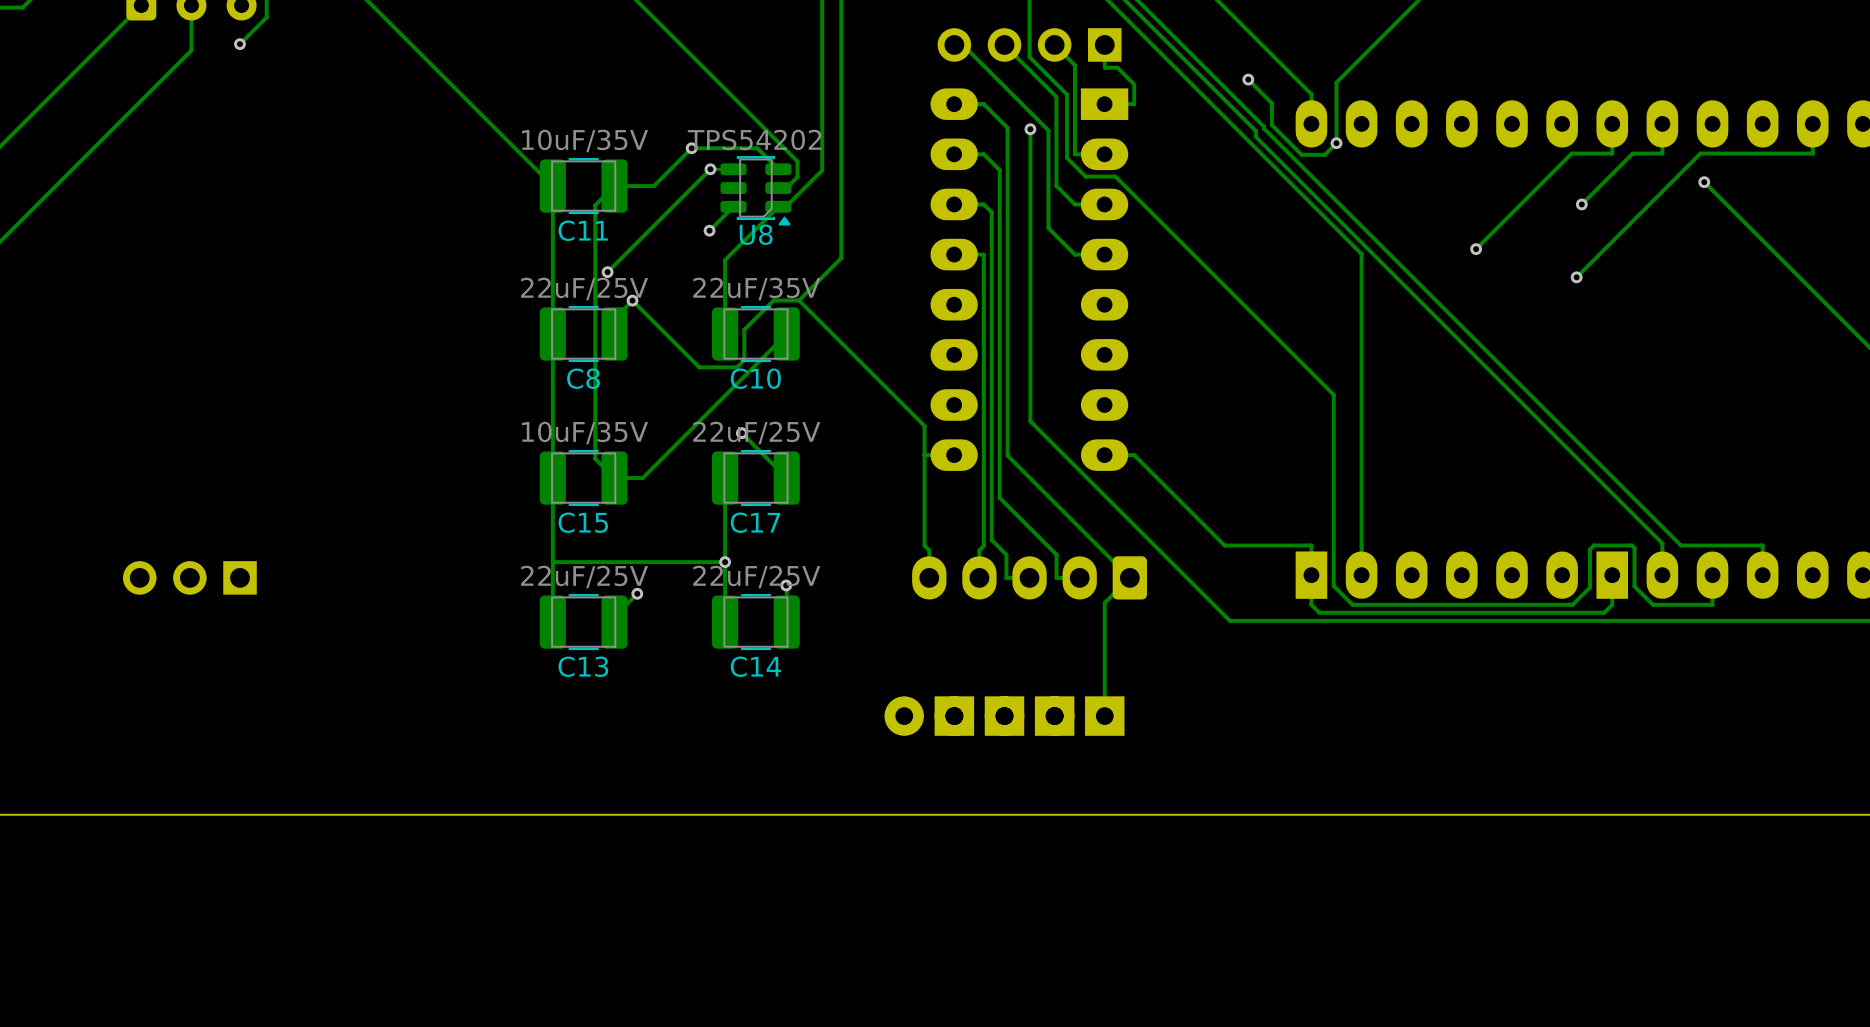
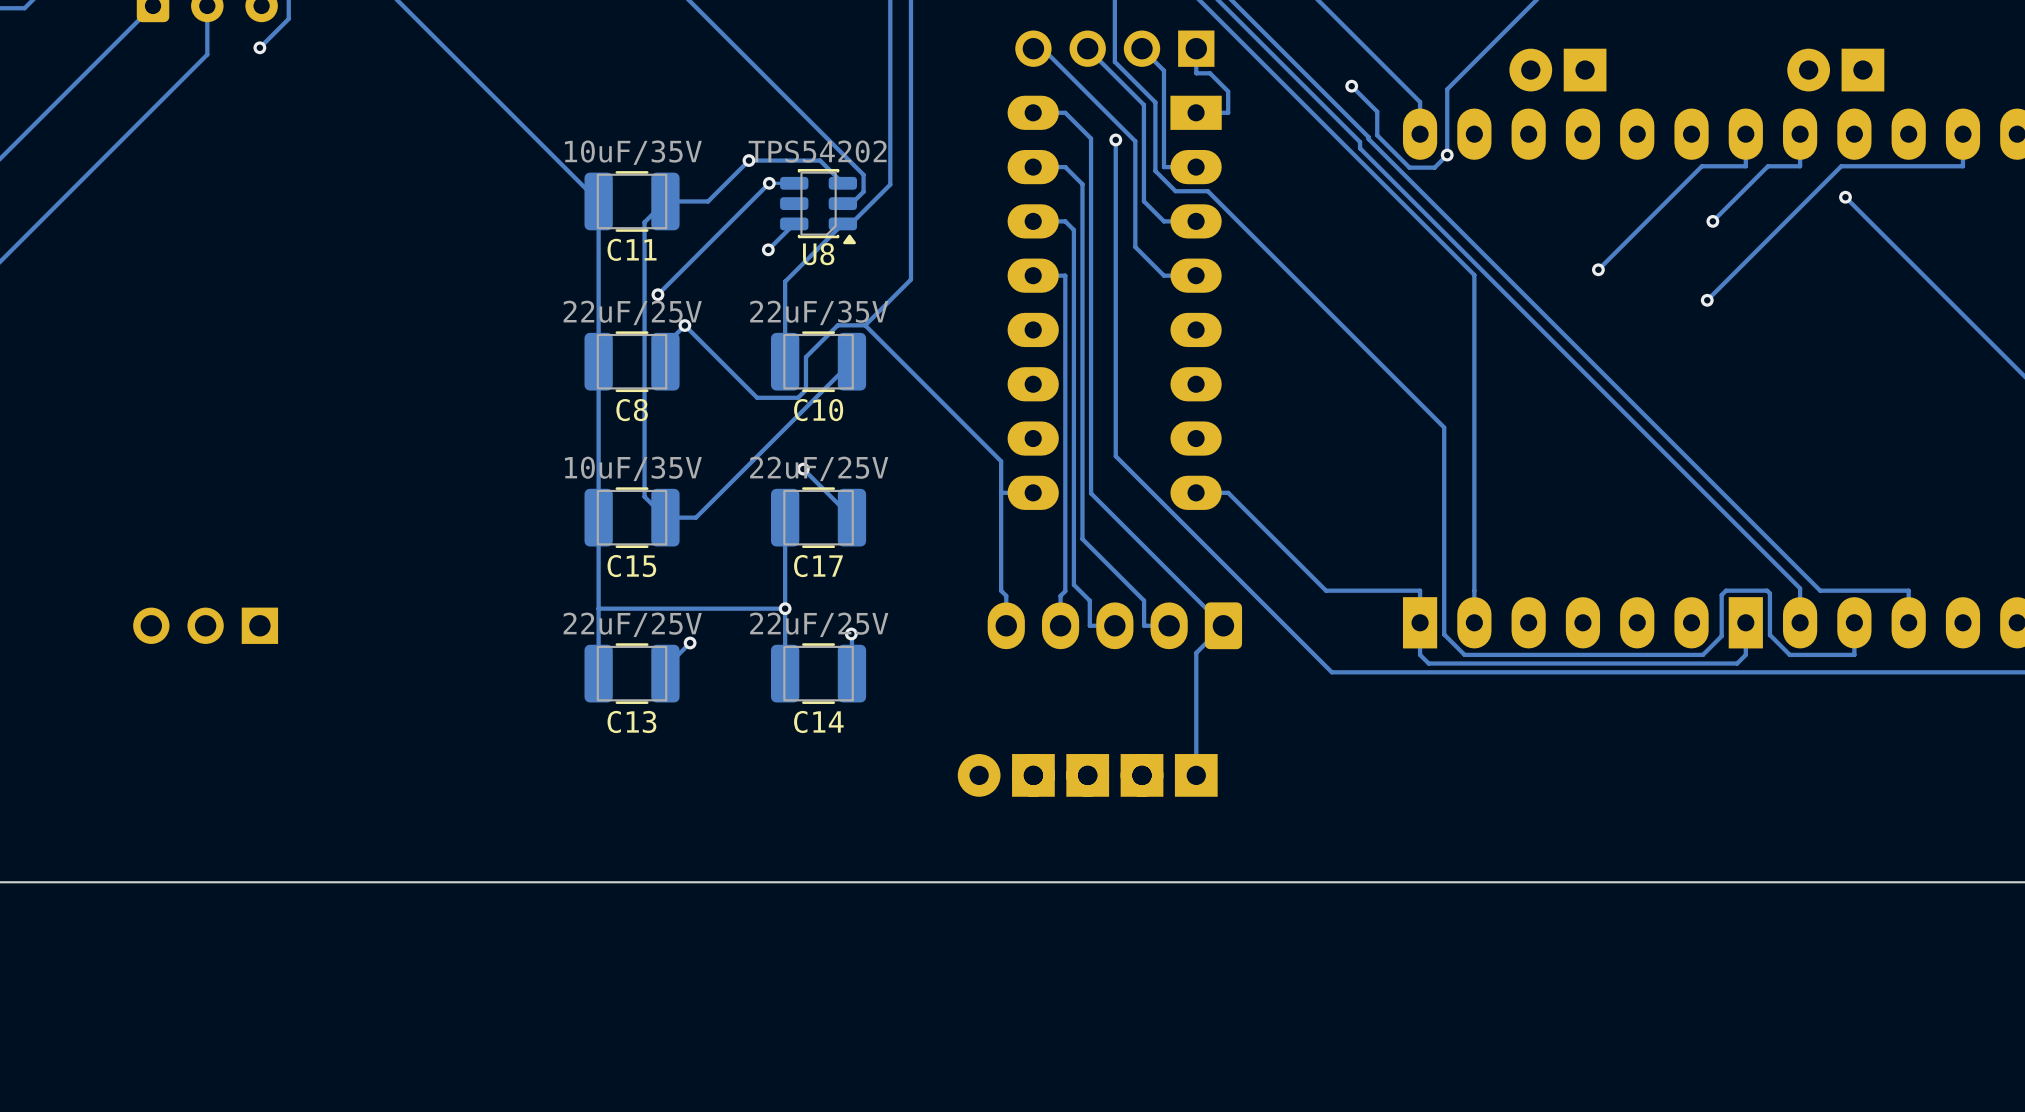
part: none -> (1557, 70)
part: none -> (1835, 70)

